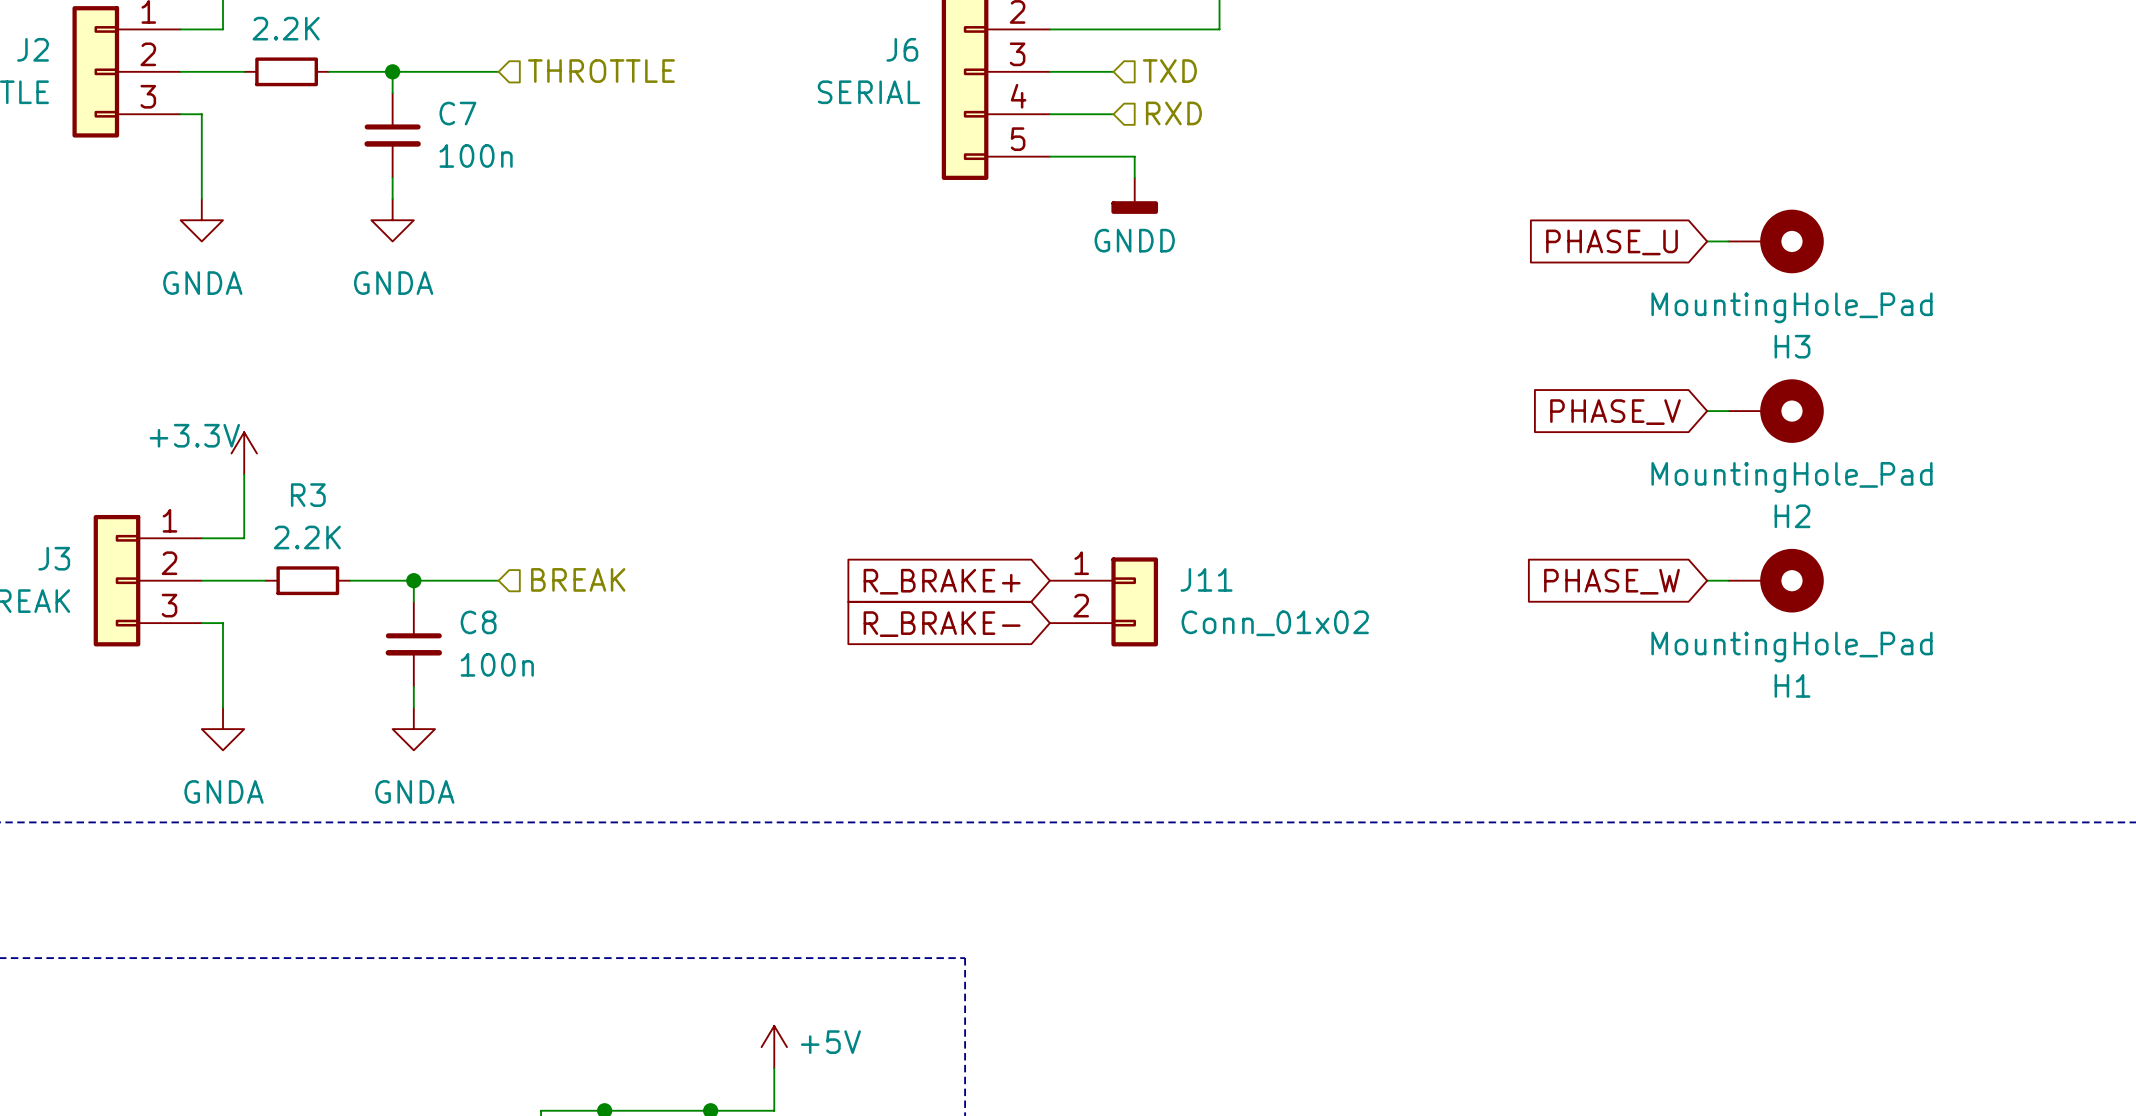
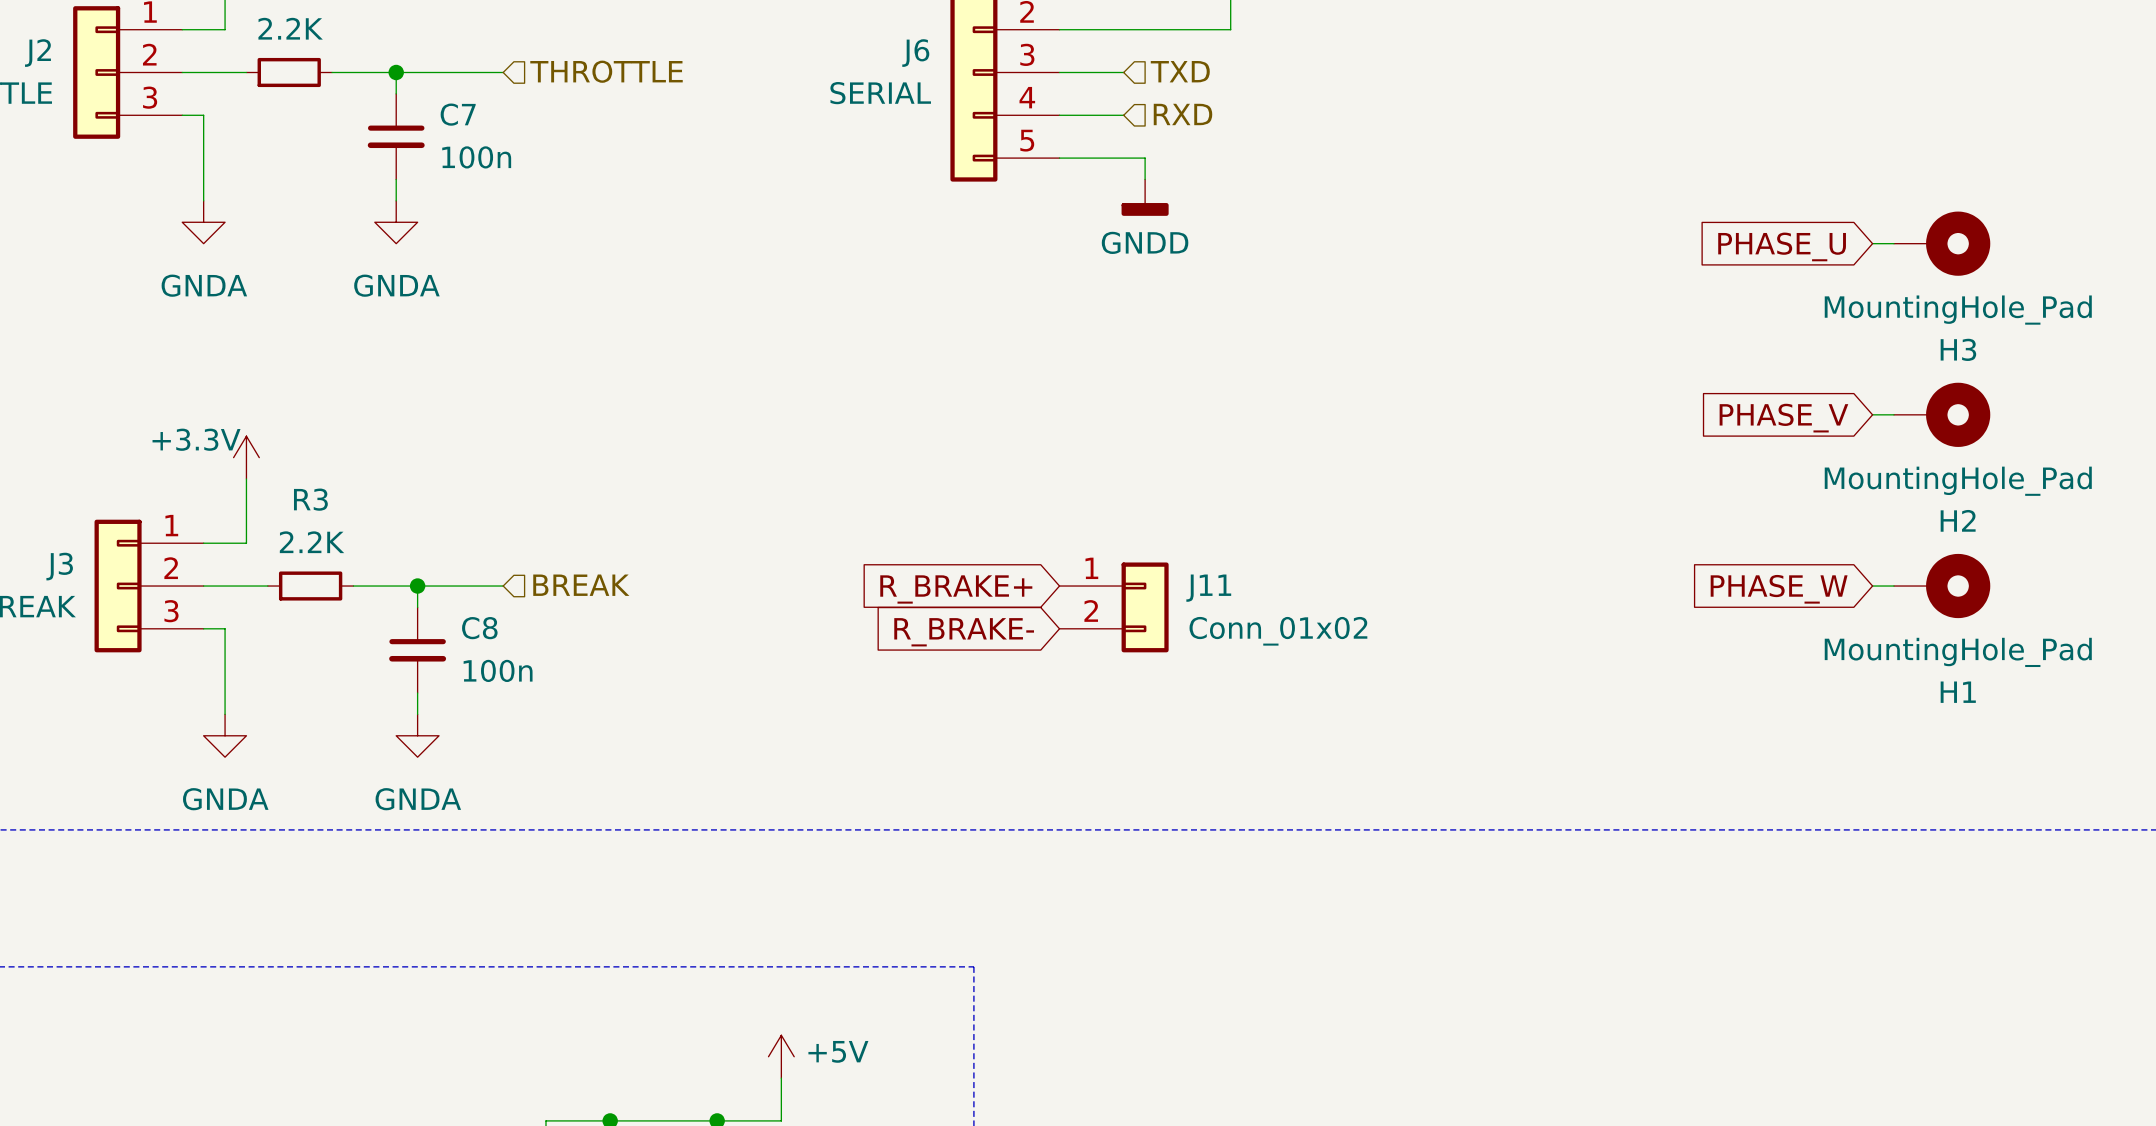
wire: (1707, 241) (1728, 241) -> (1872, 243) (1893, 243)
H3 position: (1776, 241) -> (1942, 243)
global label position: PHASE_U (1611, 242) -> PHASE_U (1782, 246)
wire: (1707, 411) (1728, 411) -> (1872, 414) (1893, 414)
H2 position: (1776, 411) -> (1942, 414)
global label position: PHASE_V (1615, 412) -> PHASE_V (1783, 418)
wire: (1707, 580) (1728, 580) -> (1872, 586) (1893, 586)
H1 position: (1776, 580) -> (1942, 586)
global label position: PHASE_W (1611, 581) -> PHASE_W (1779, 589)

